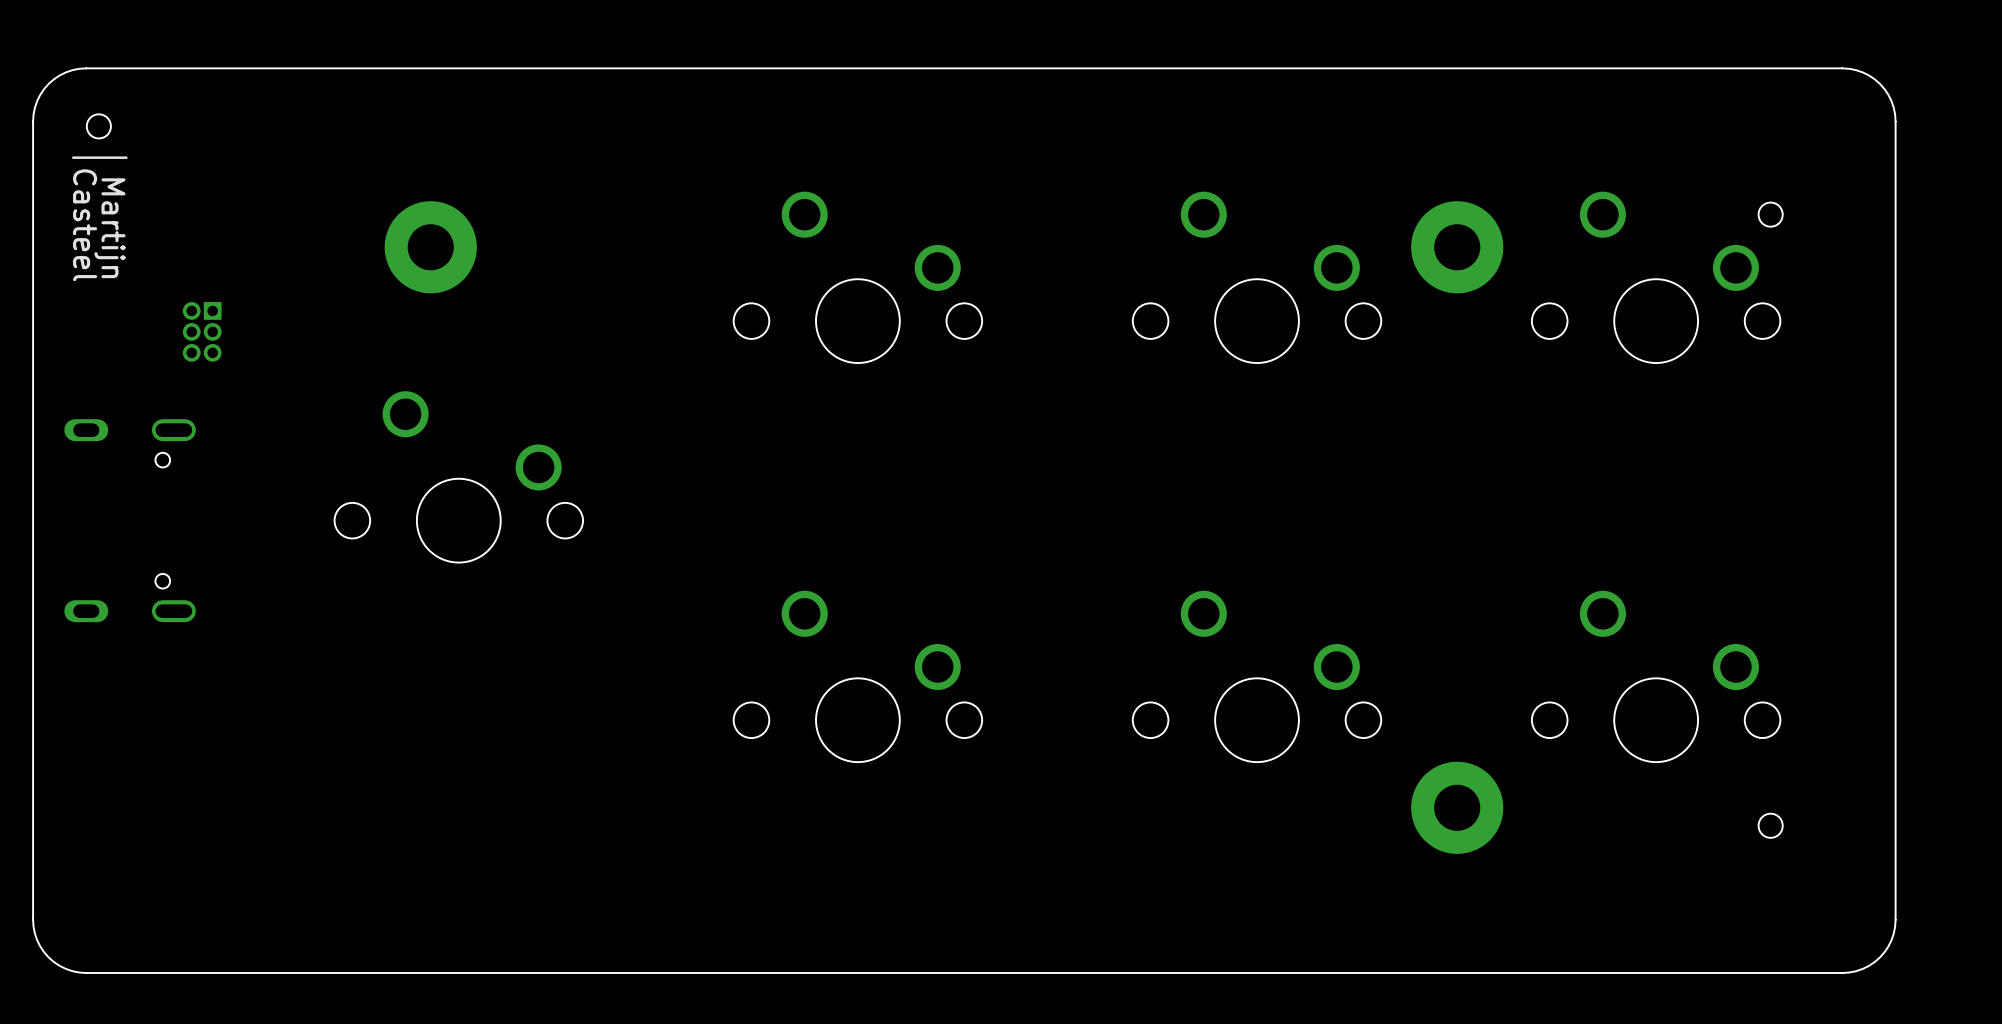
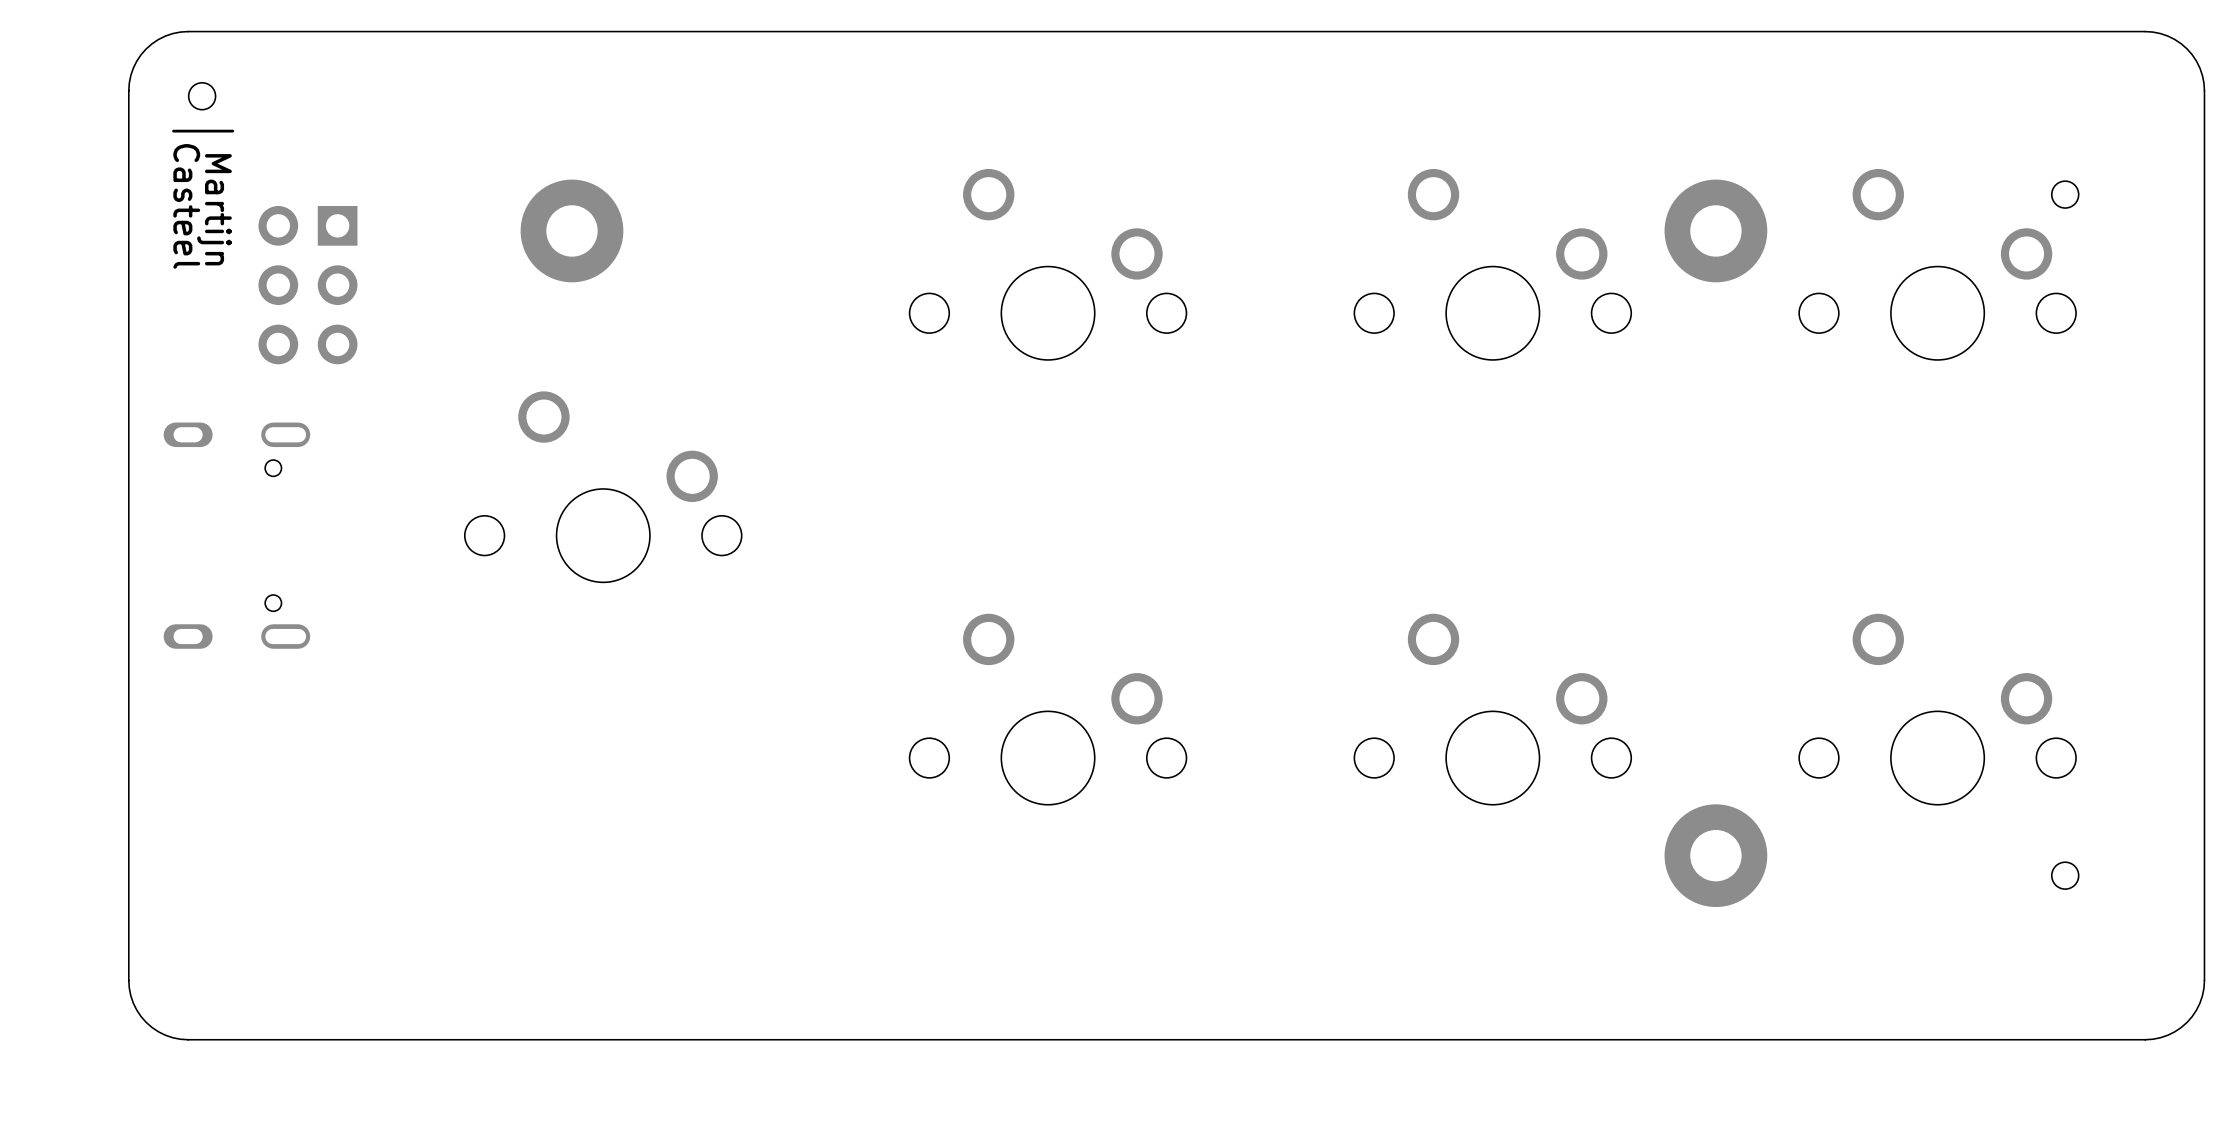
part: none -> (307, 285)
part: (202, 331) -> none

